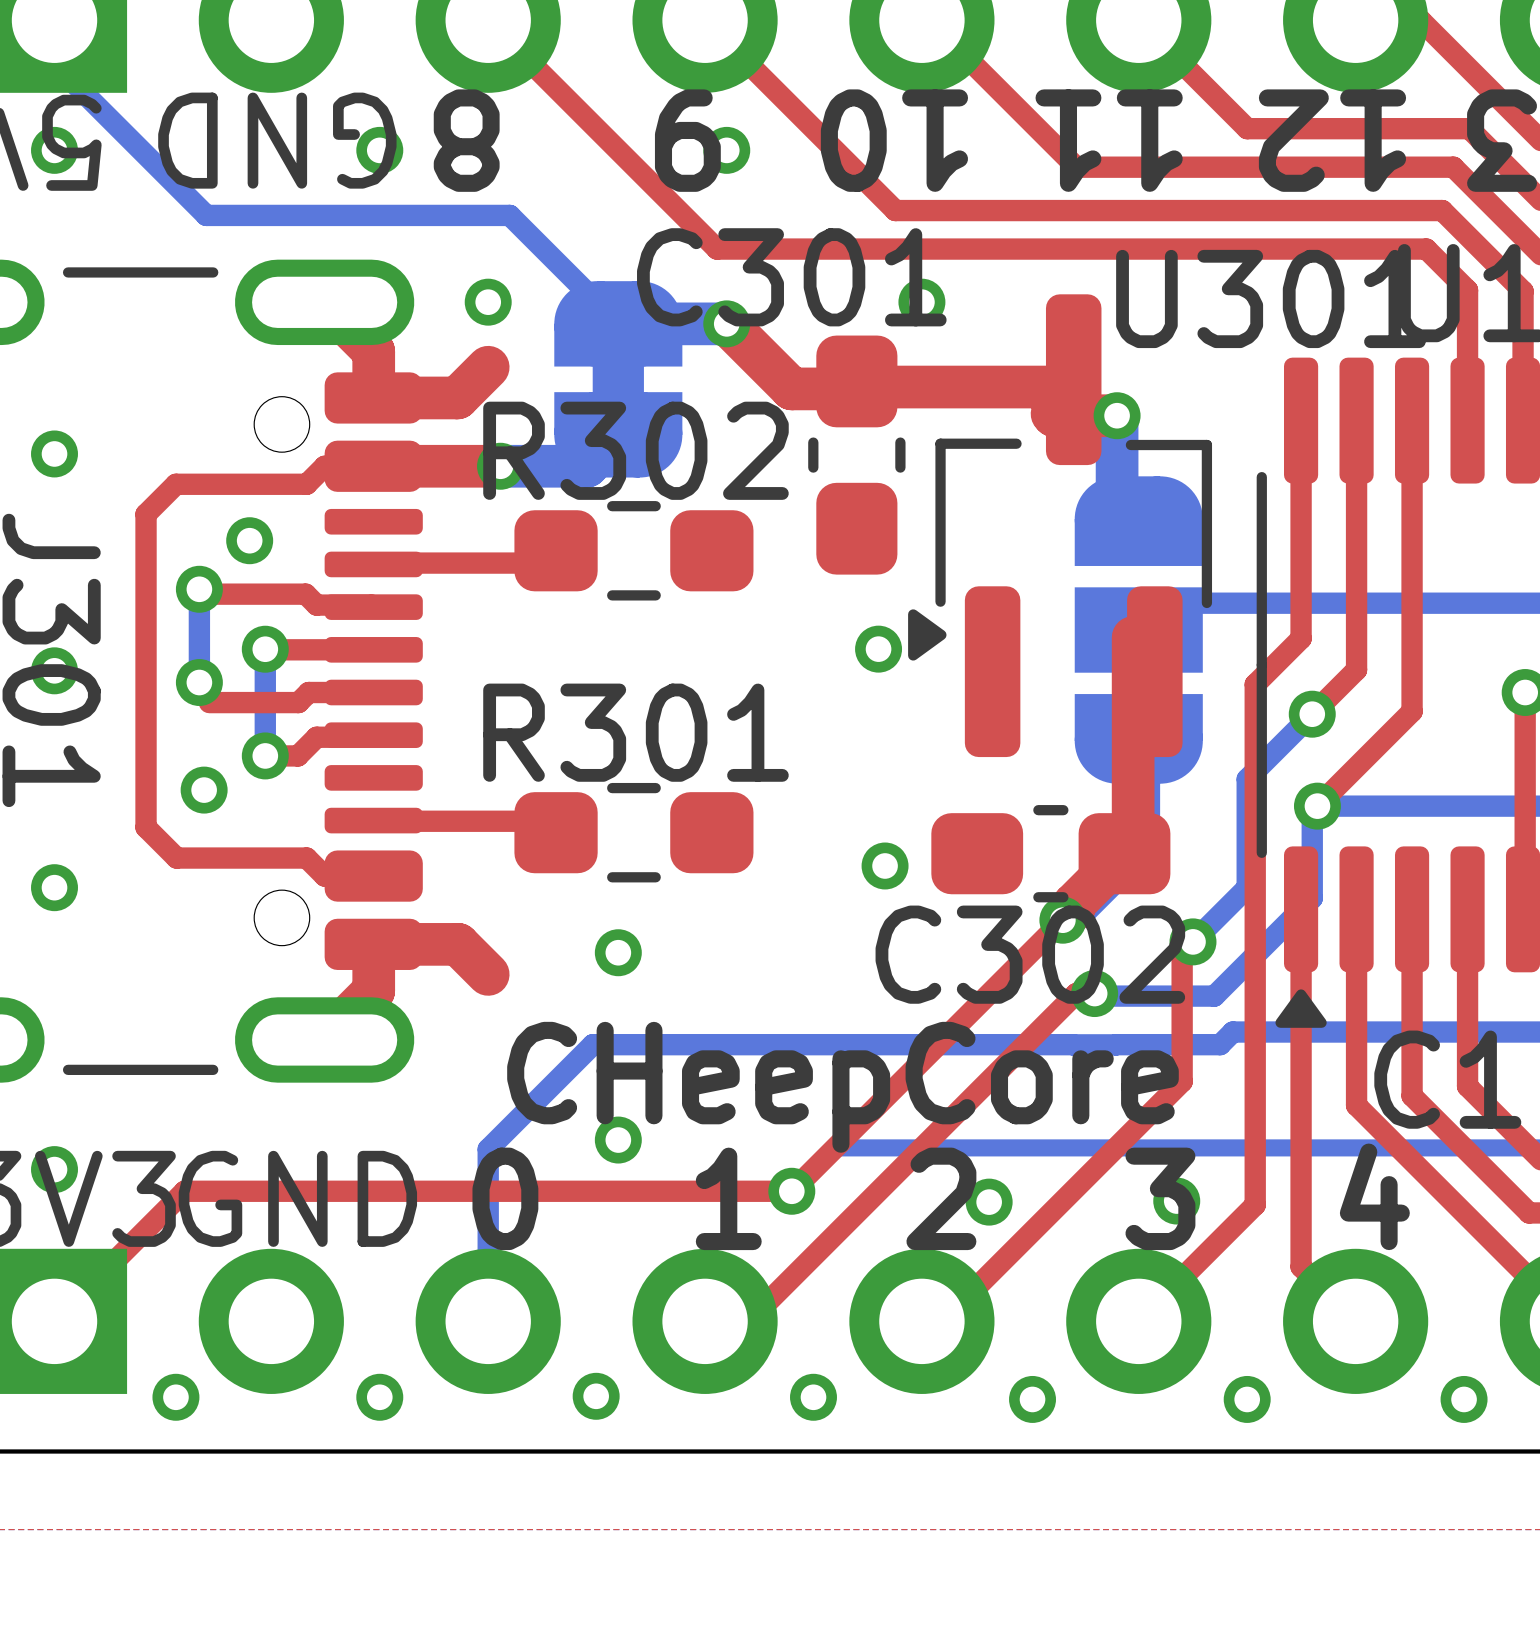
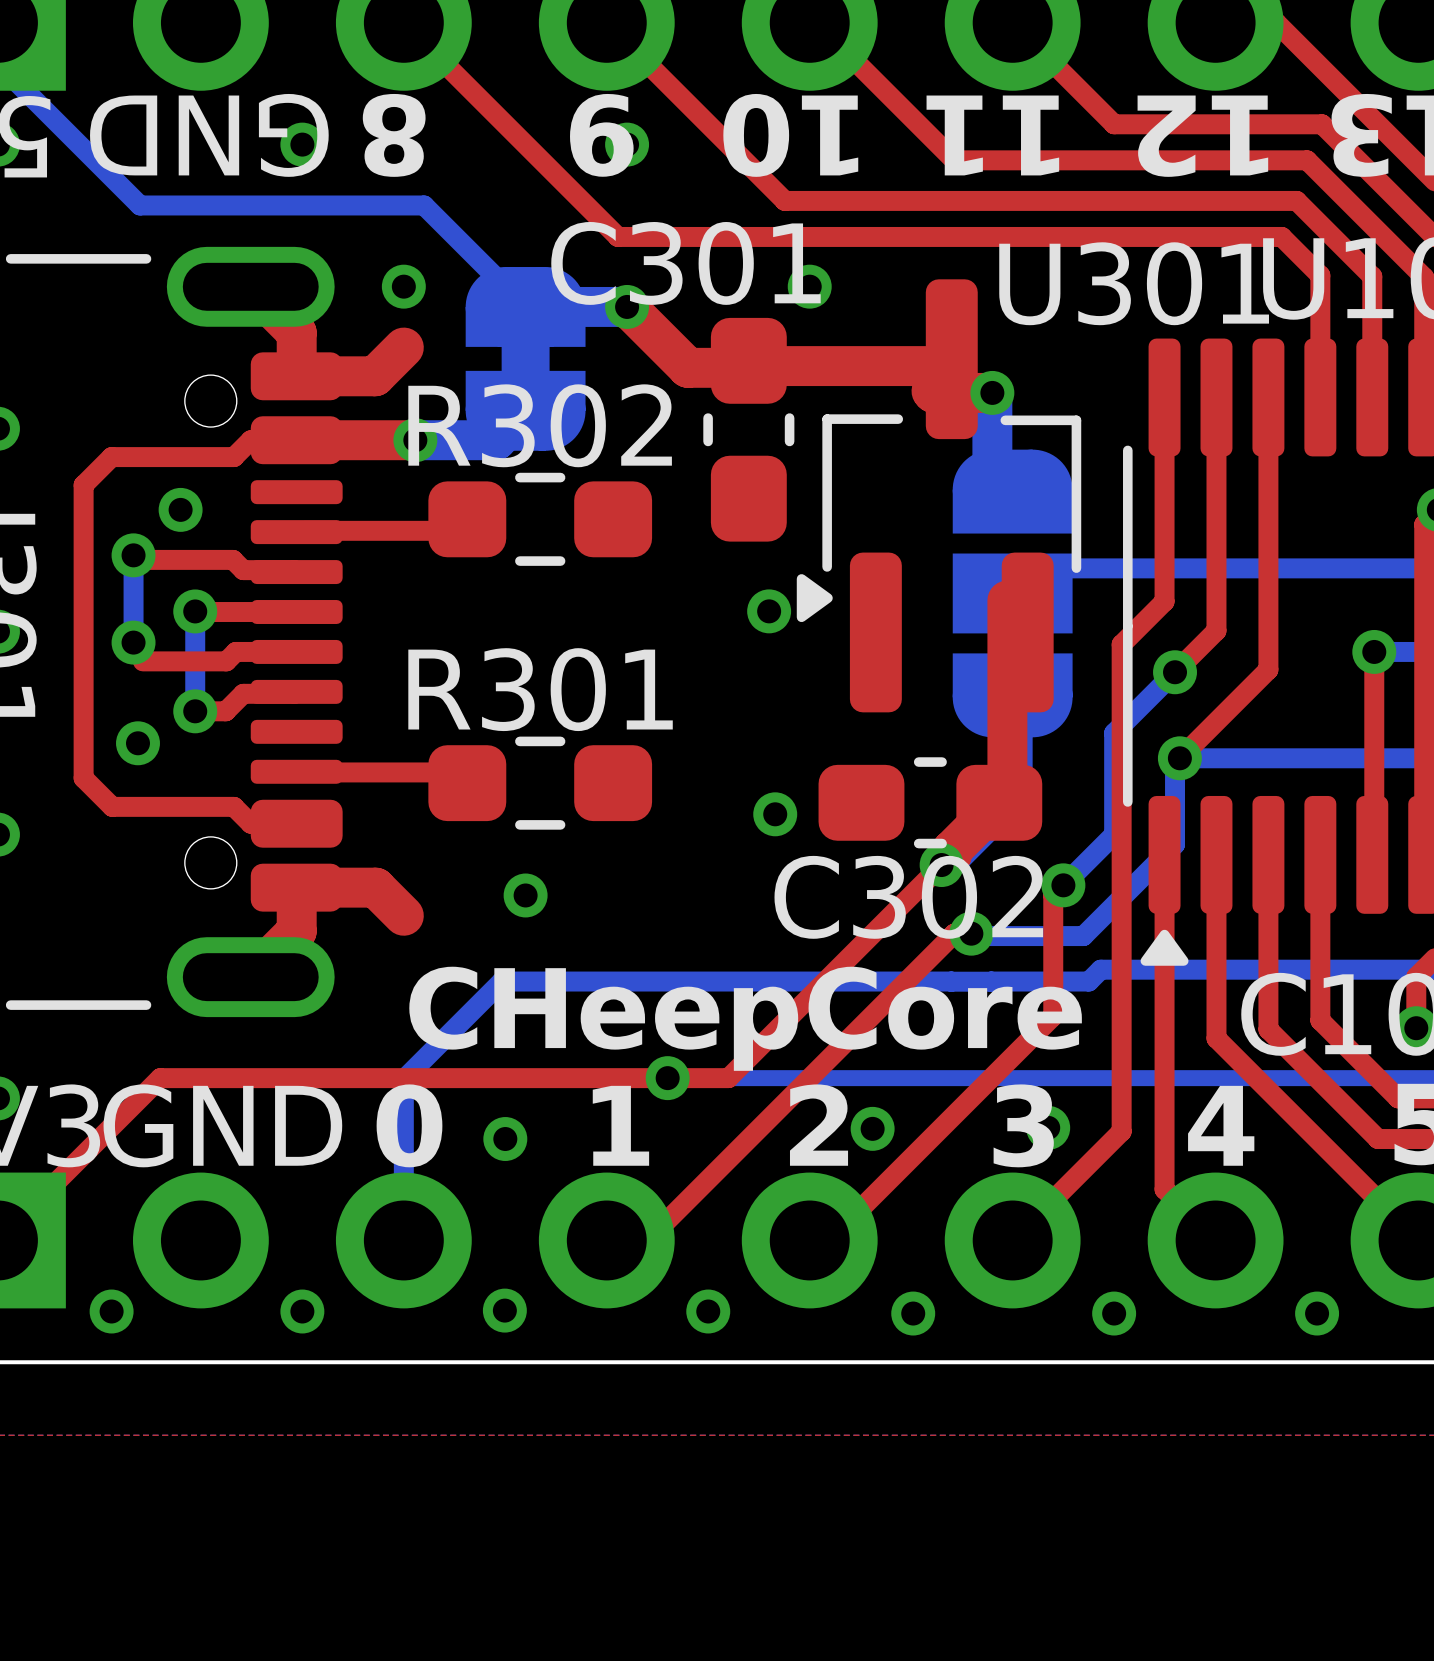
via: (618, 1140) -> none
top track: (835, 1147) (791, 1191) (184, 1191) -> (728, 1078) (160, 1078) (119, 1118)
via position: (791, 1191) -> (667, 1078)
via: none -> (505, 1139)

